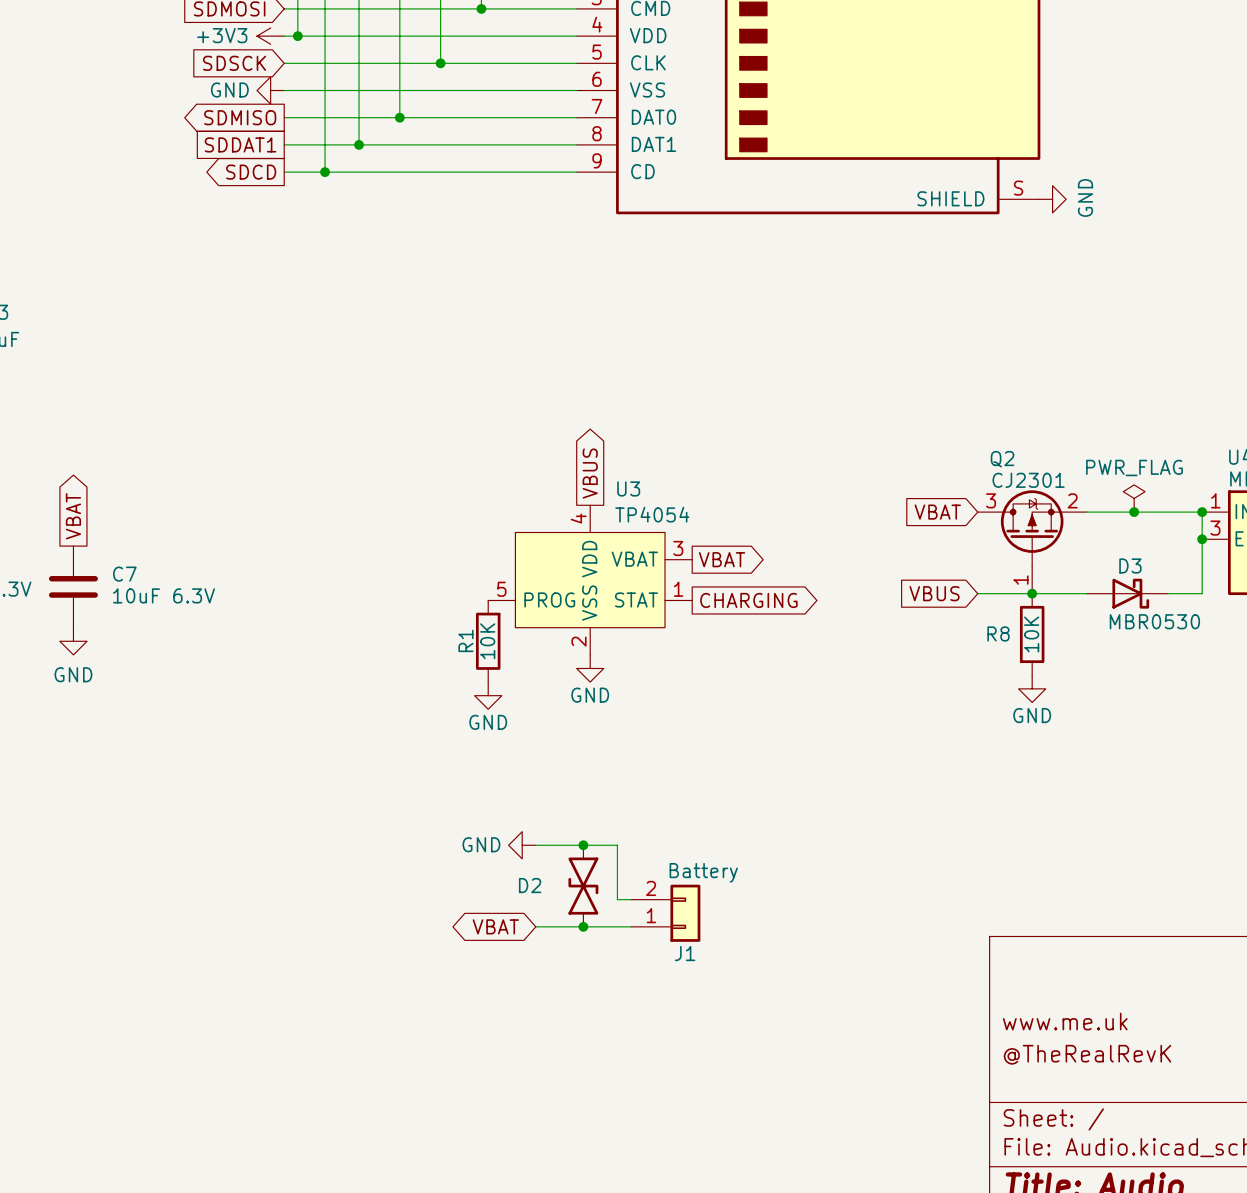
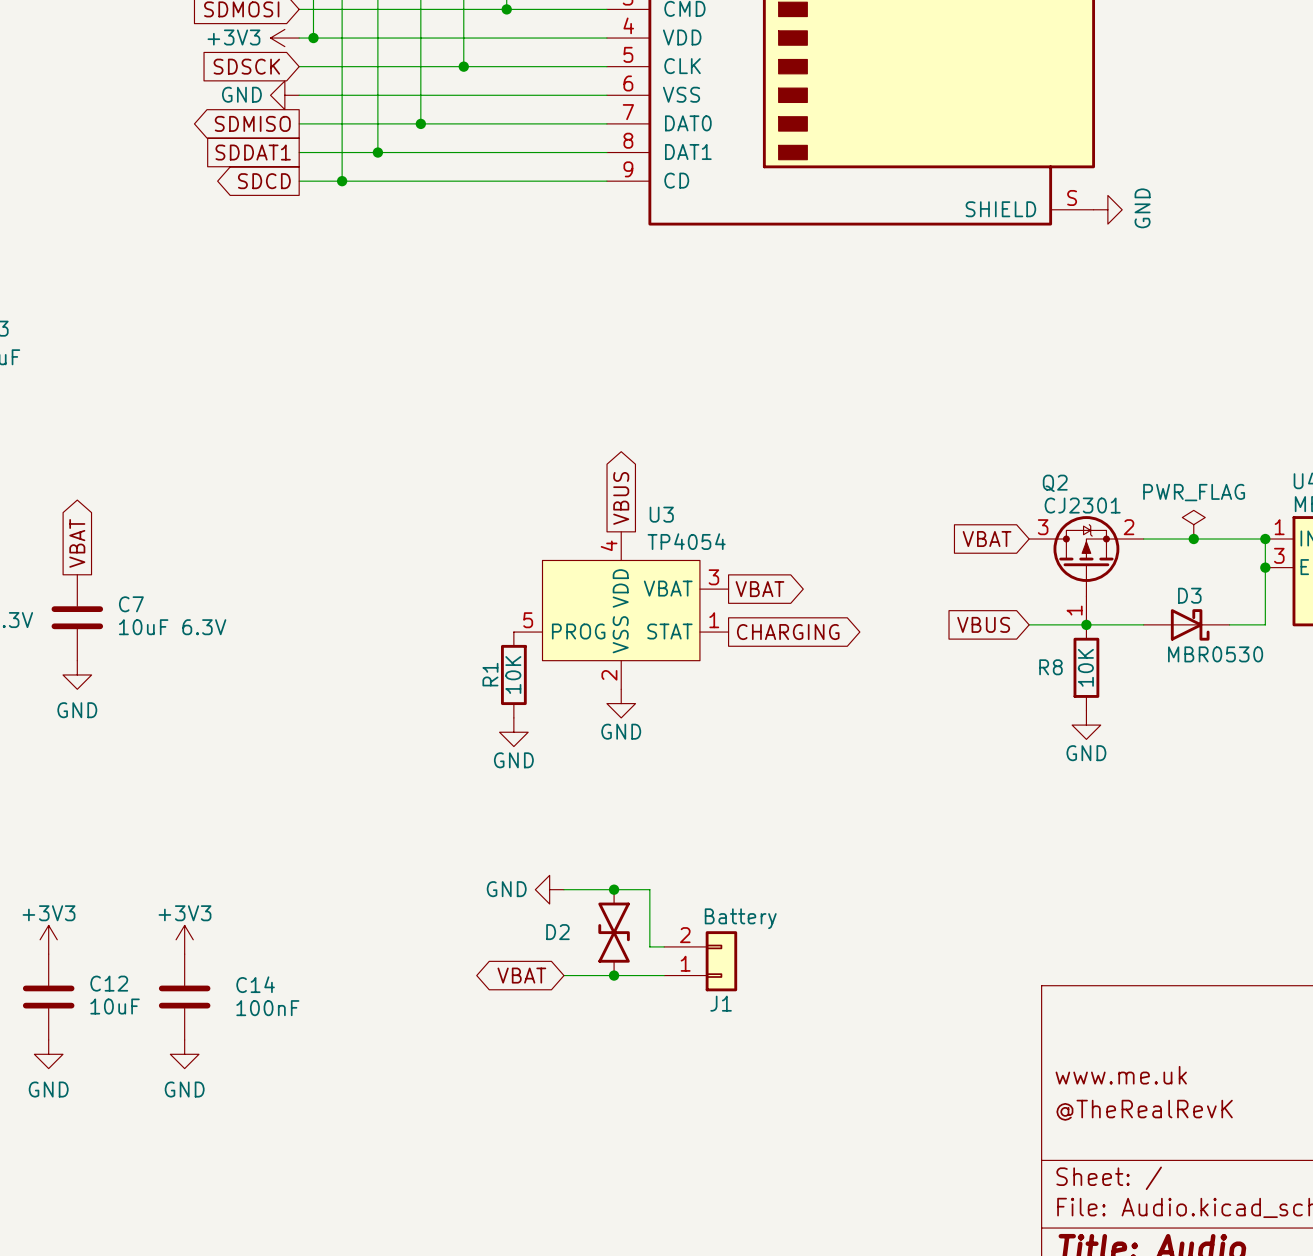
power symbol: none -> +3V3 (48, 939)
power symbol: none -> +3V3 (184, 939)
C12: none -> 10uF (48, 997)
C14: none -> 100nF (184, 997)
power symbol: none -> GND (48, 1054)
power symbol: none -> GND (184, 1054)

